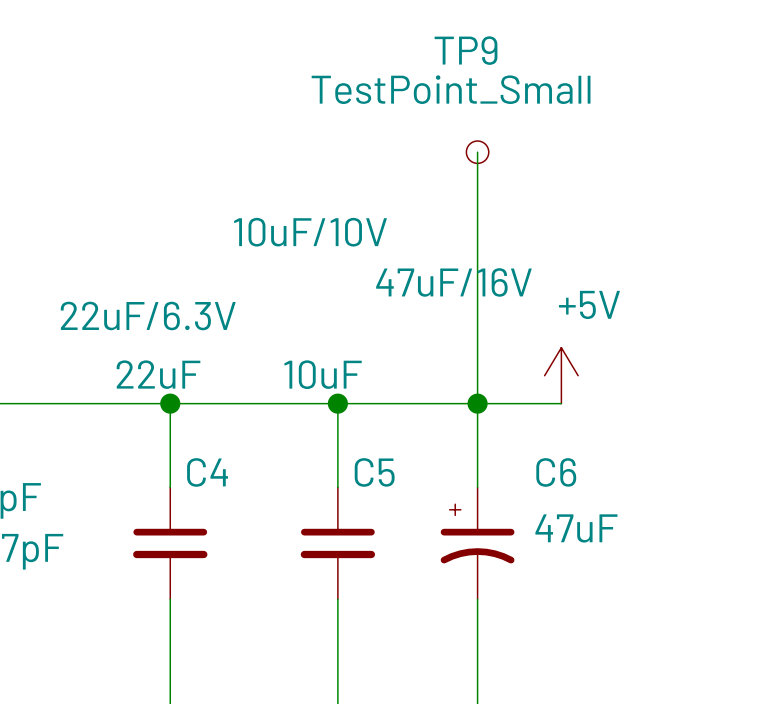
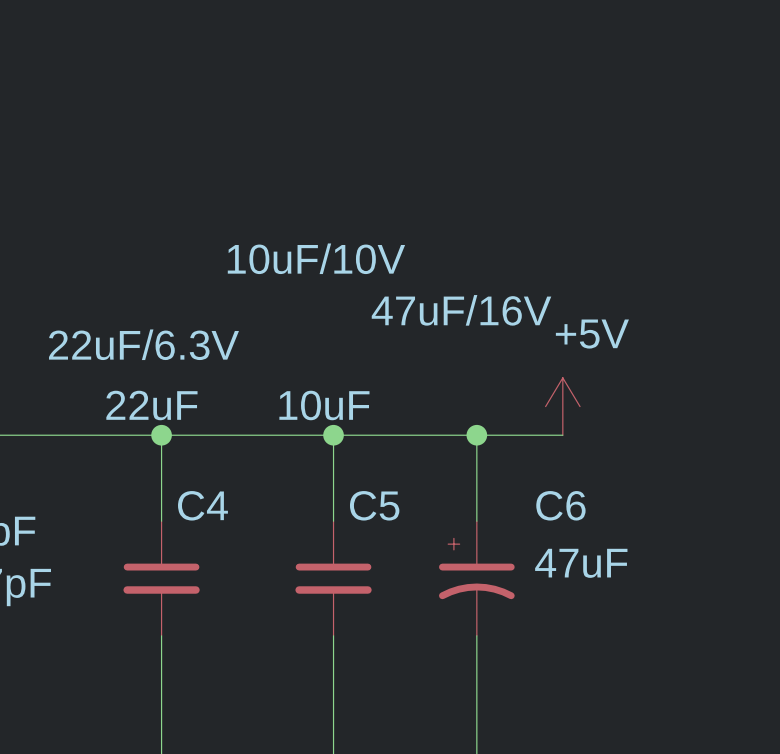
wire: (477, 152) (477, 403) -> none
TP9: TestPoint_Small (477, 152) -> none

